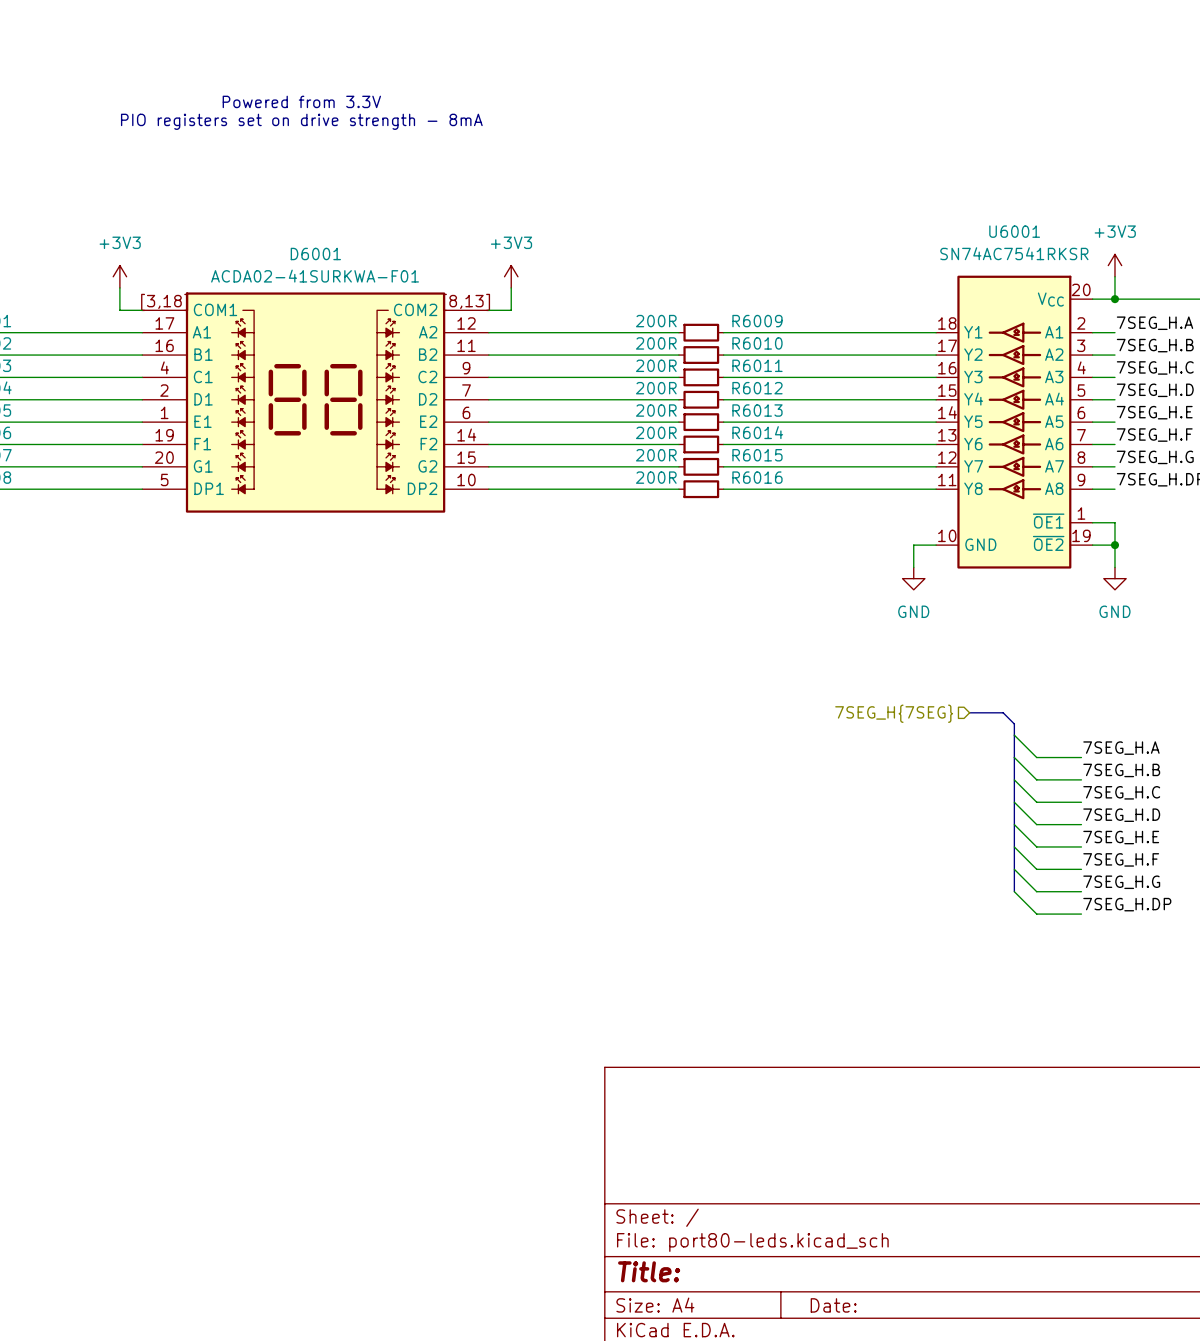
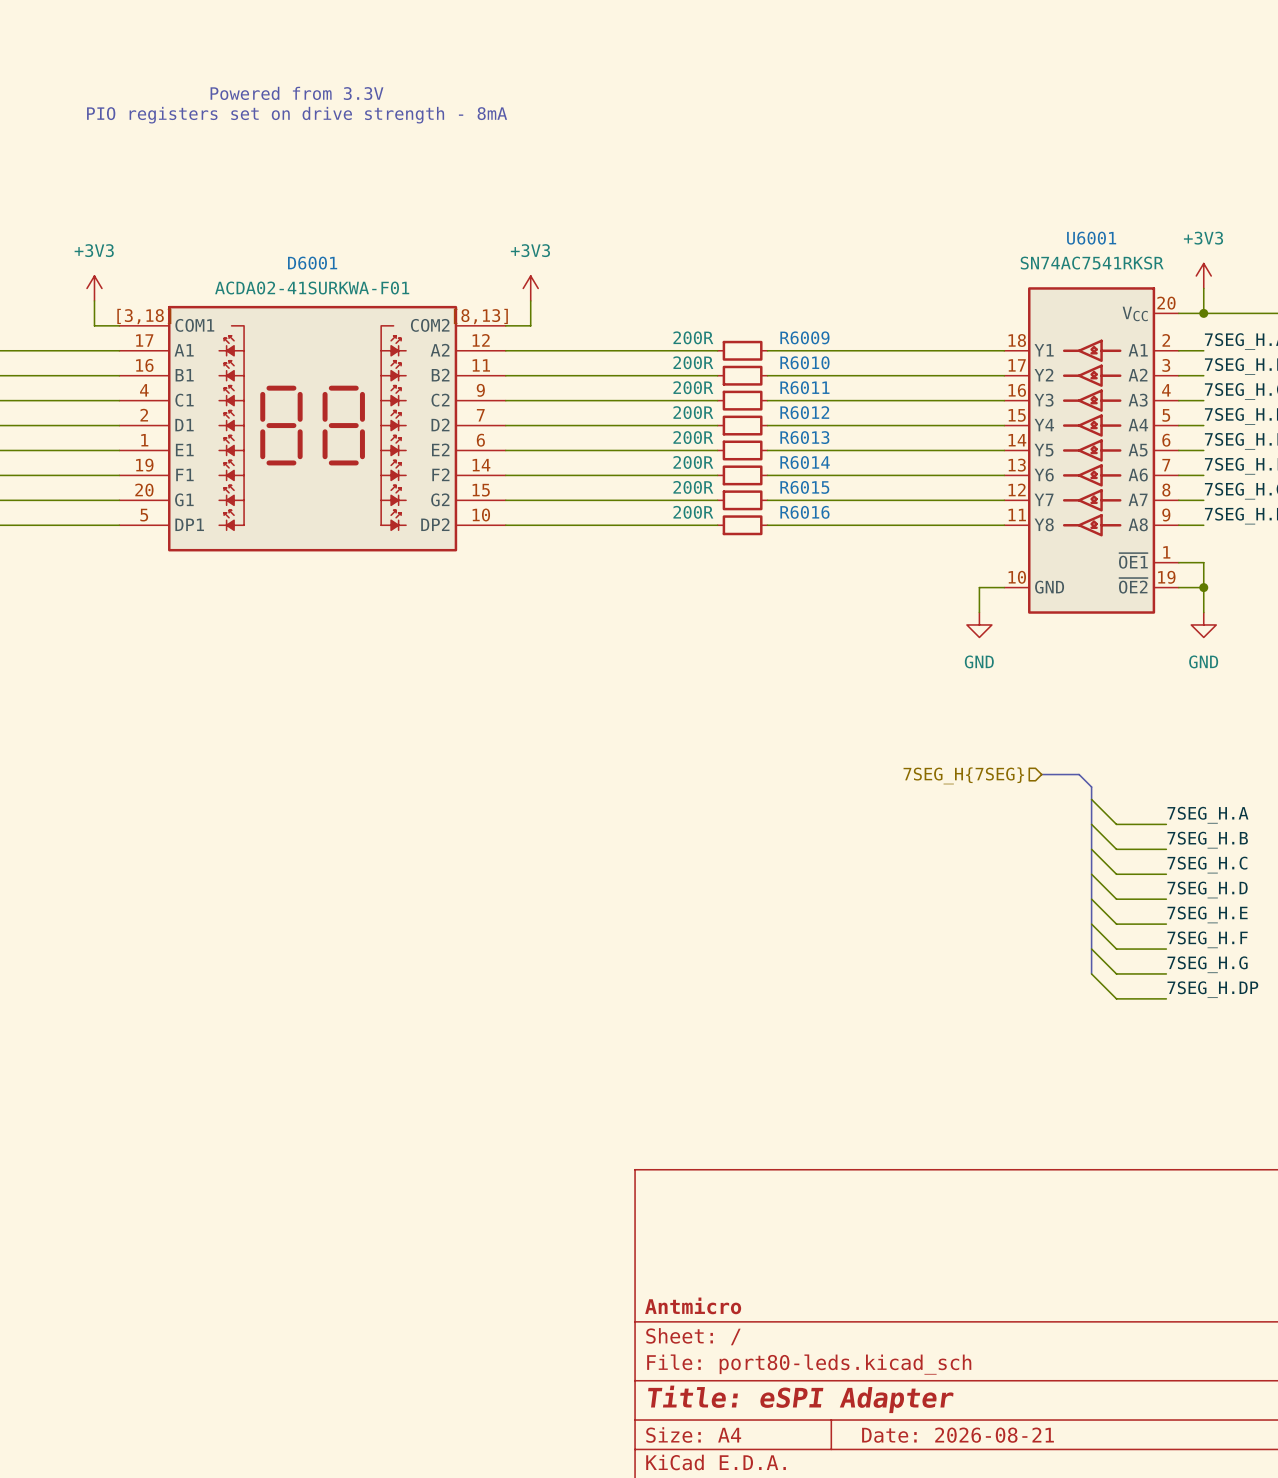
title block: none -> Antmicro (693, 1305)
title block: Title: (649, 1271) -> Title: eSPI Adapter (800, 1399)
title block: Date: (833, 1305) -> Date: 2026-08-21 (958, 1435)

